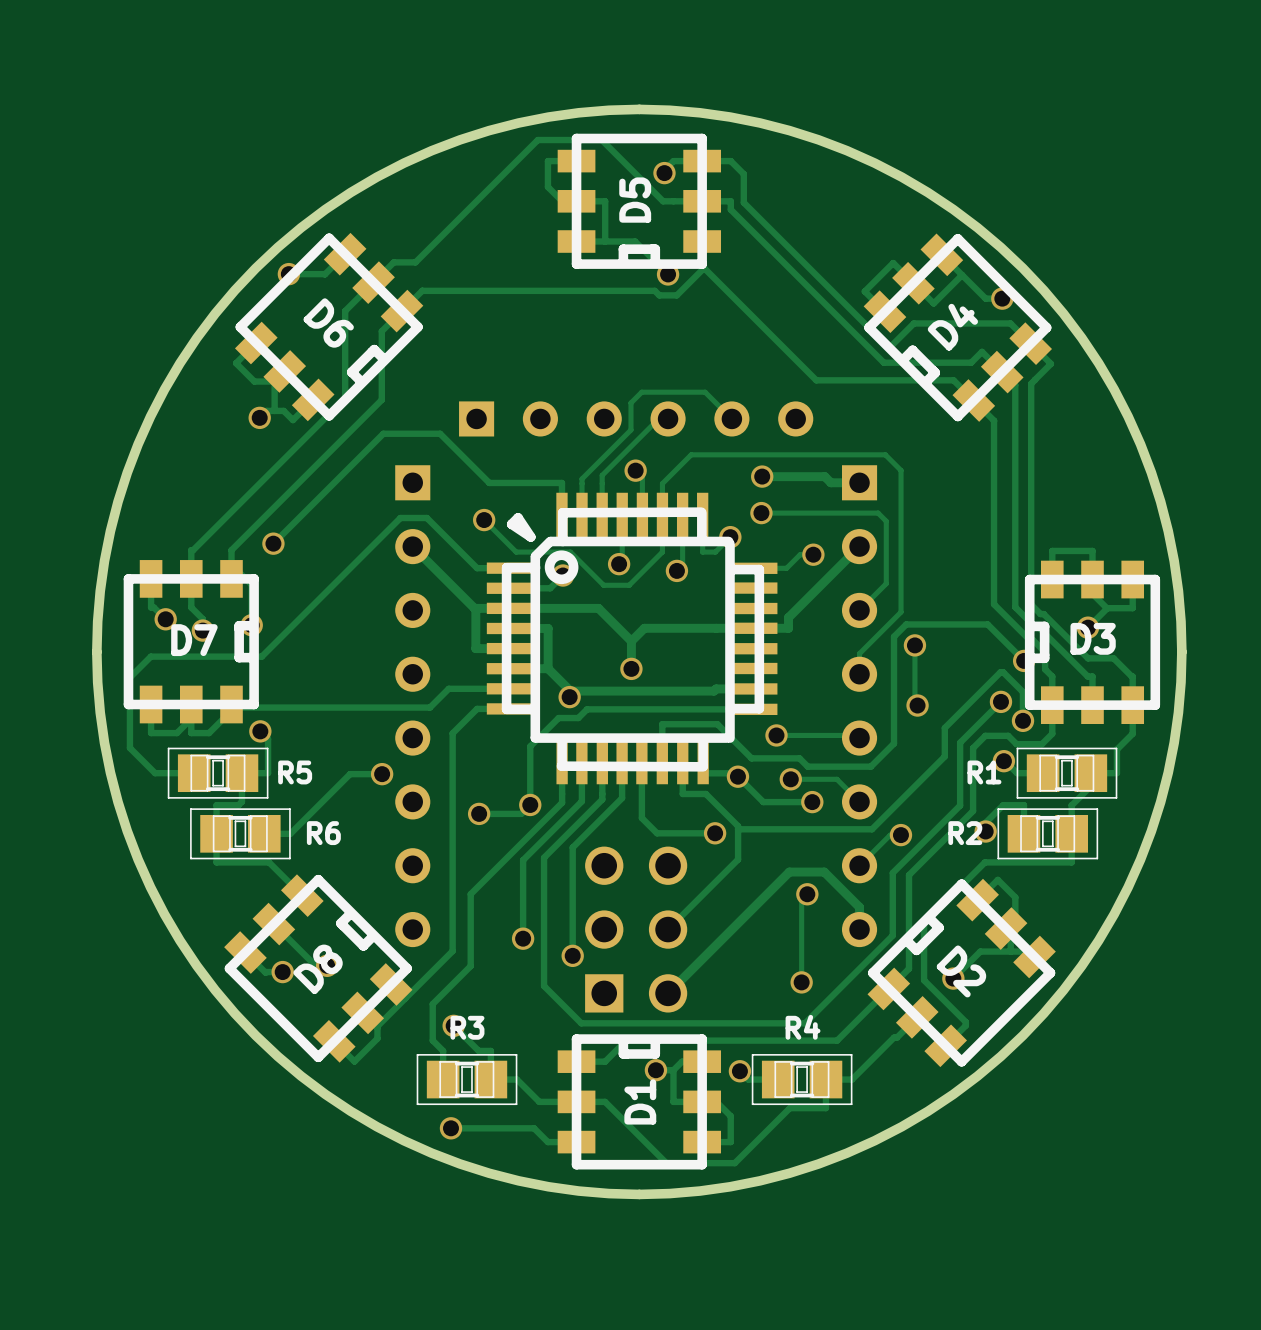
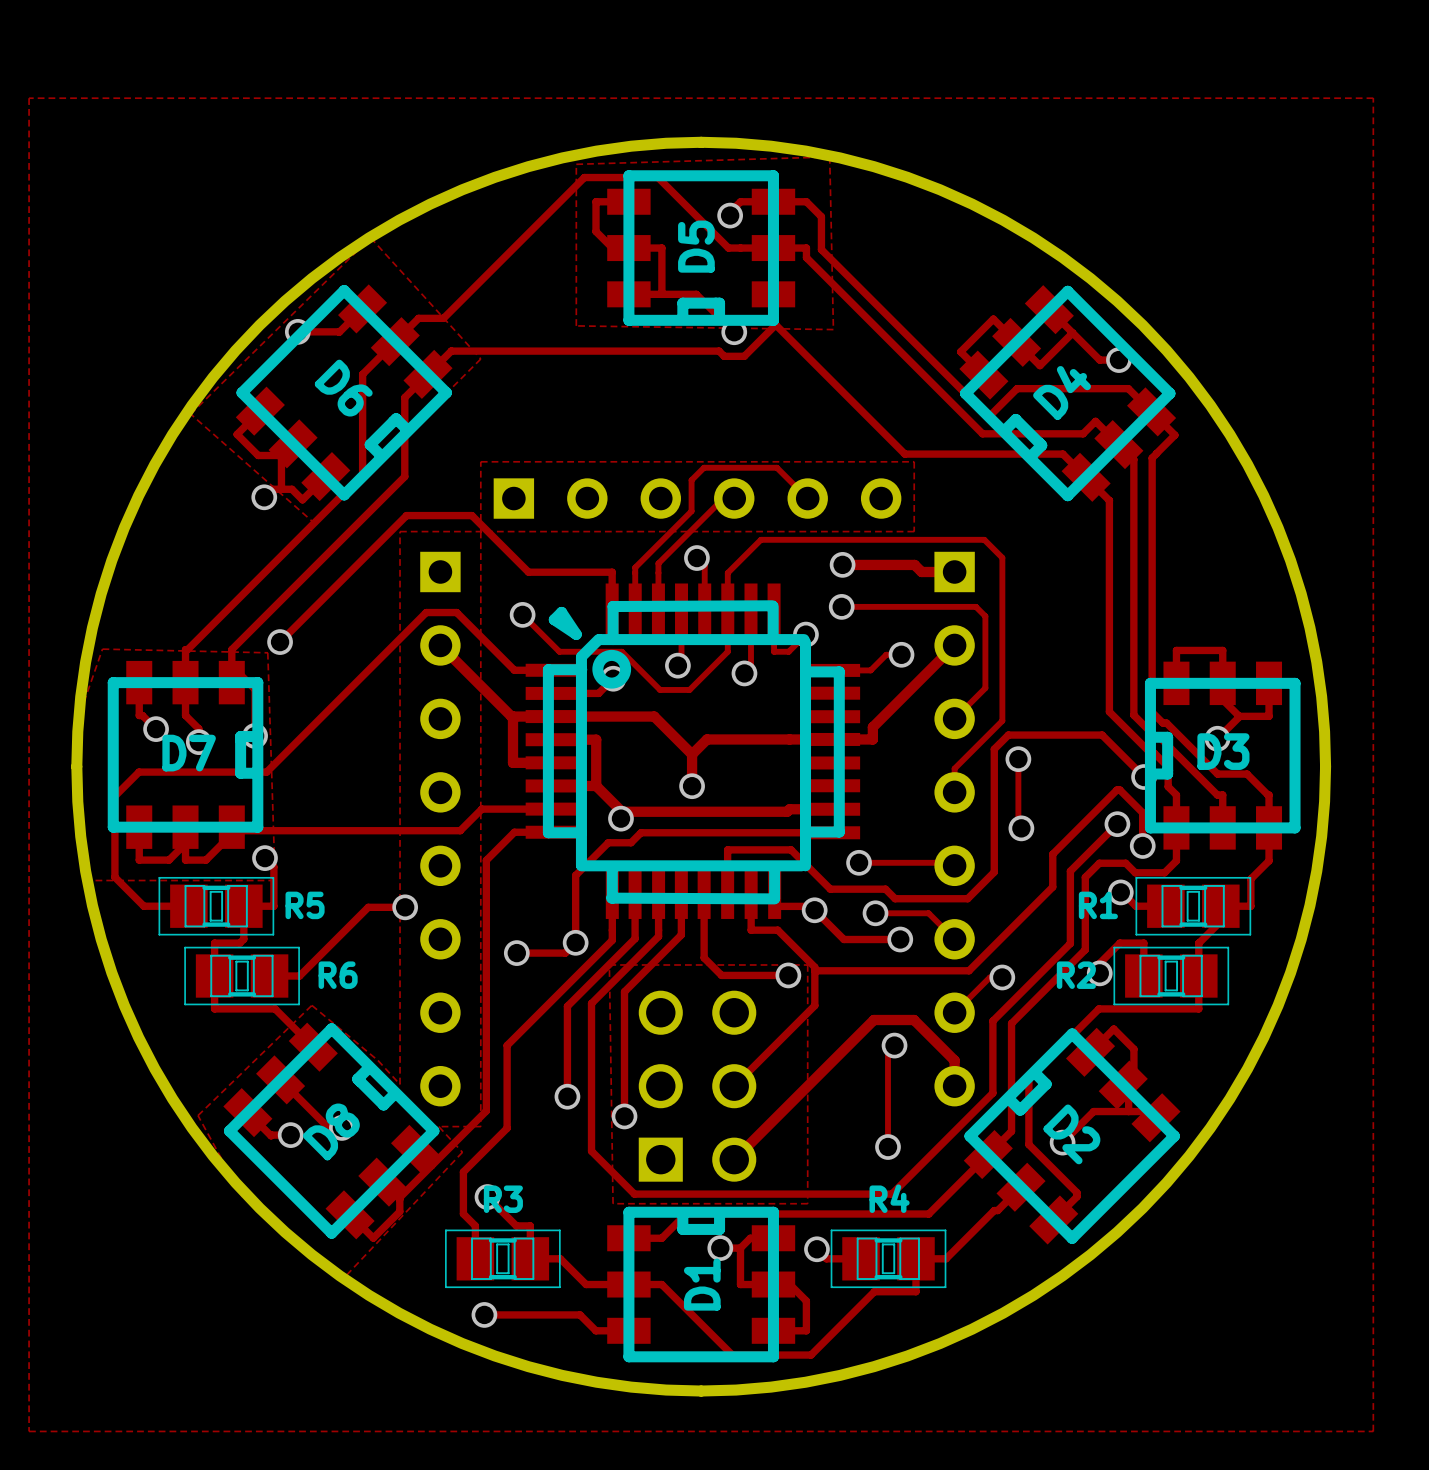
zone outline: none -> (29, 98) (1373, 98) (1373, 1431) (29, 1431) (29, 98)
zone outline: none -> (829, 156) (833, 329) (576, 325) (576, 164) (829, 156)
zone outline: none -> (370, 237) (190, 414) (315, 524) (480, 358) (370, 237)
zone outline: none -> (480, 461) (480, 1126) (438, 1126) (462, 1152) (341, 1280) (242, 1196) (198, 1115) (311, 1005) (377, 1060) (400, 1084) (400, 531) (914, 531) (914, 461) (480, 461)
zone outline: none -> (102, 649) (76, 722) (84, 880) (275, 880) (267, 652) (102, 649)
zone outline: none -> (609, 964) (613, 1203) (807, 1203) (807, 964) (609, 964)

